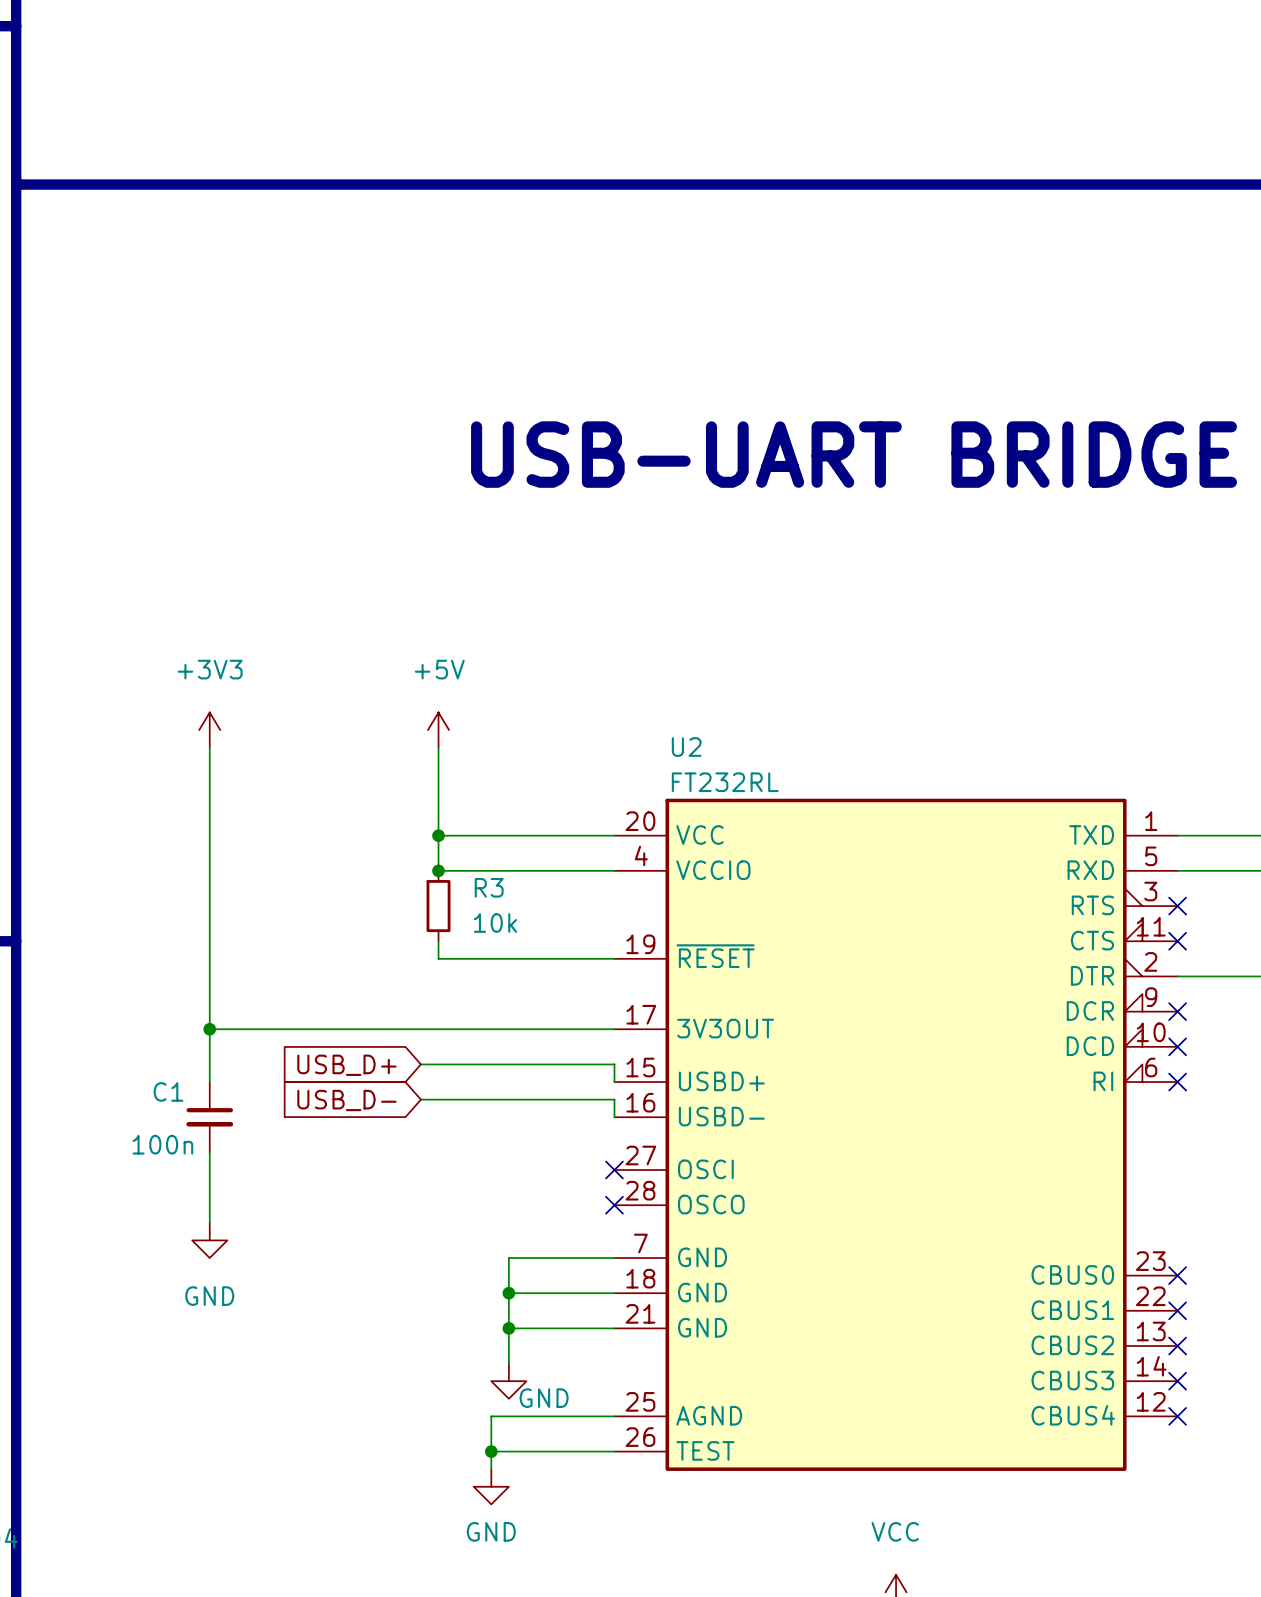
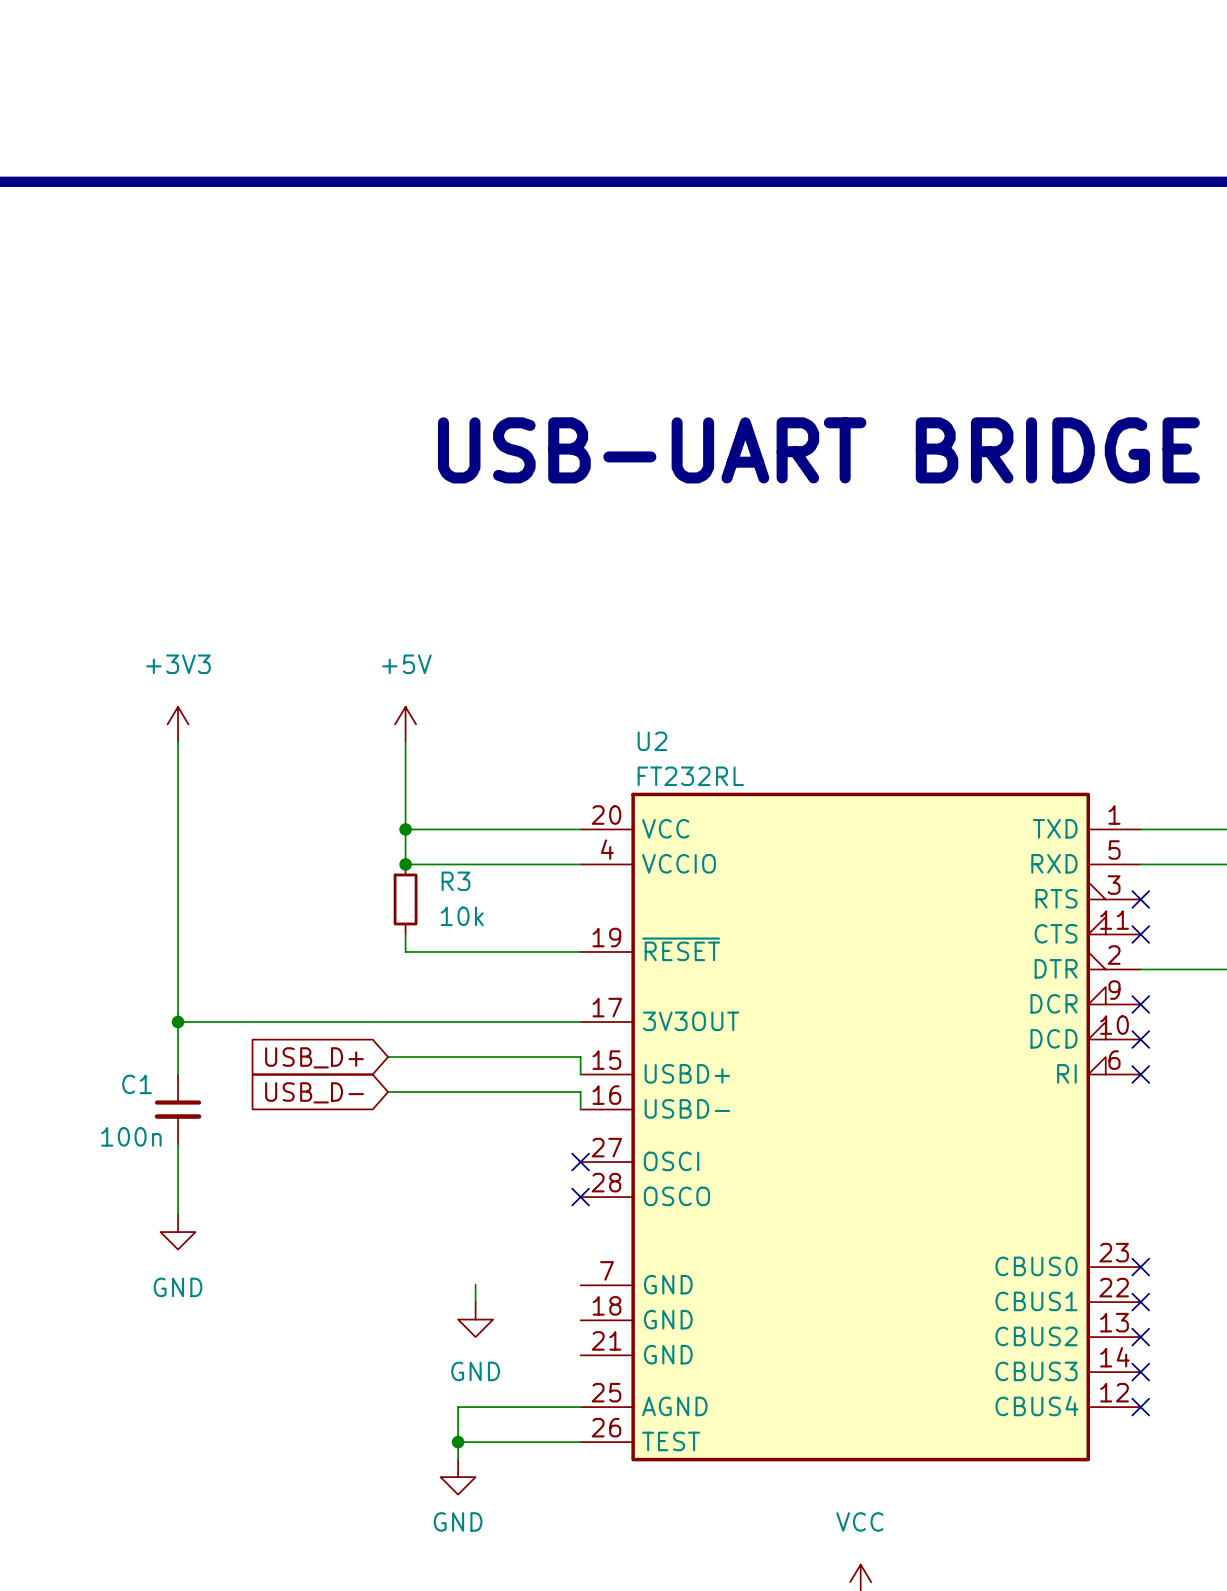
U2 symbol: [614, 798, 1178, 1471] -> [580, 792, 1141, 1462]
wire: (614, 1258) (508, 1258) (508, 1293) (614, 1293) -> none
junction: (508, 1293) -> none
wire: (508, 1310) (508, 1363) -> none
wire: (508, 1328) (614, 1328) -> none
junction: (508, 1328) -> none
power symbol position: GND (508, 1381) -> GND (475, 1319)
power symbol text position: GND (544, 1398) -> GND (475, 1371)

